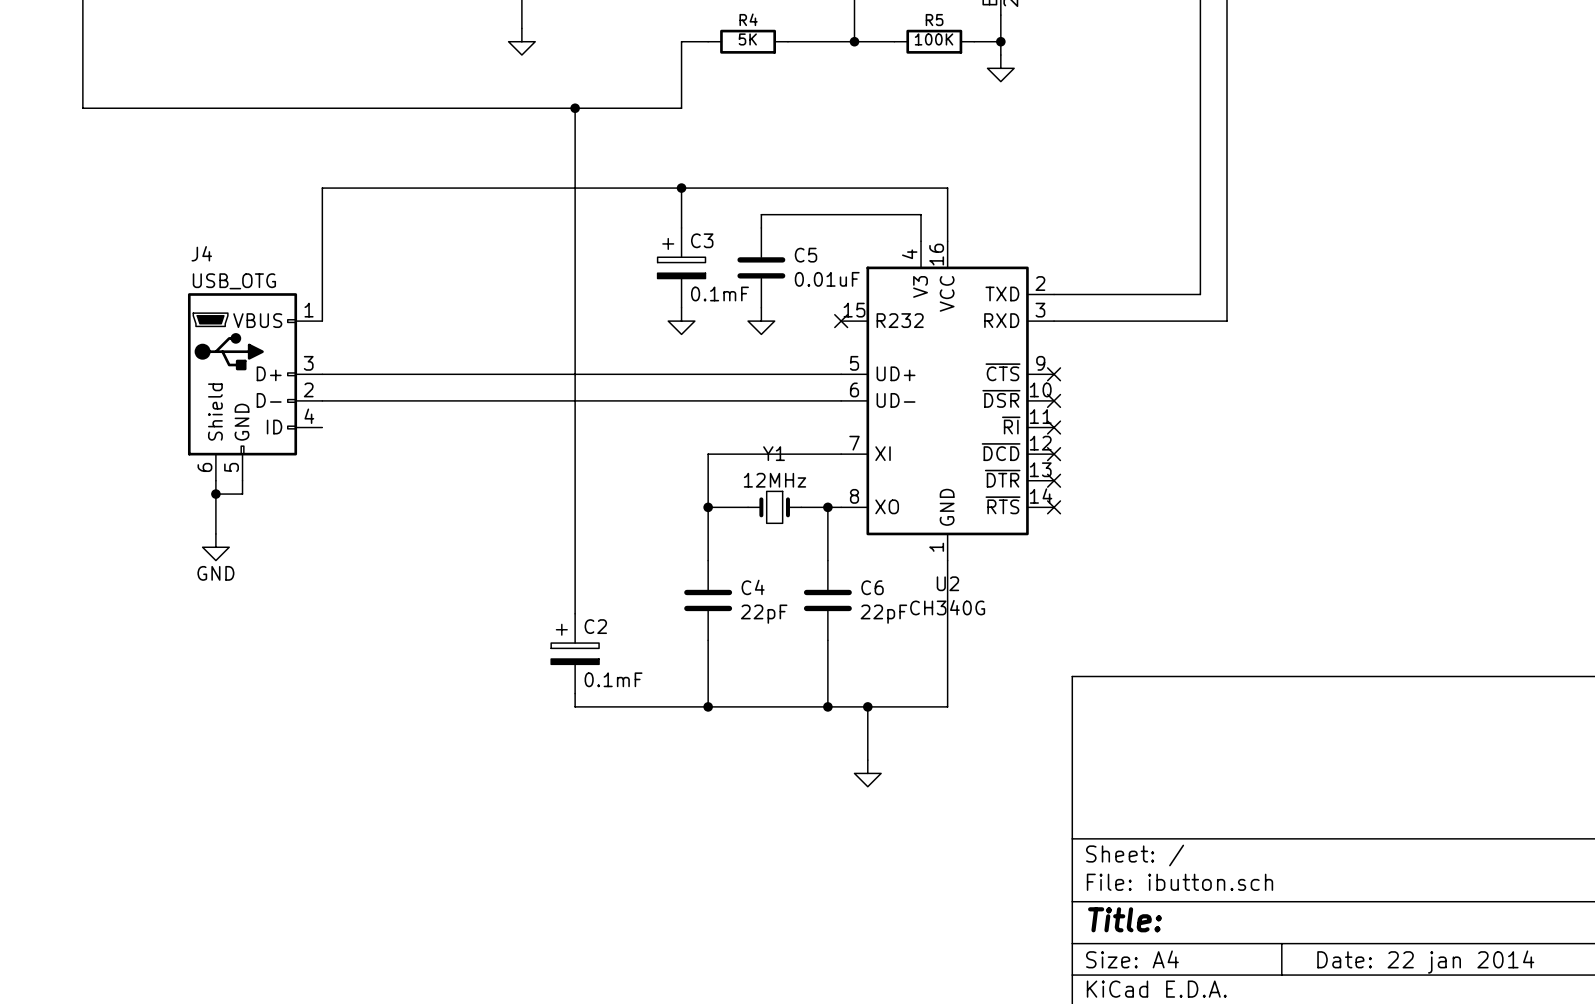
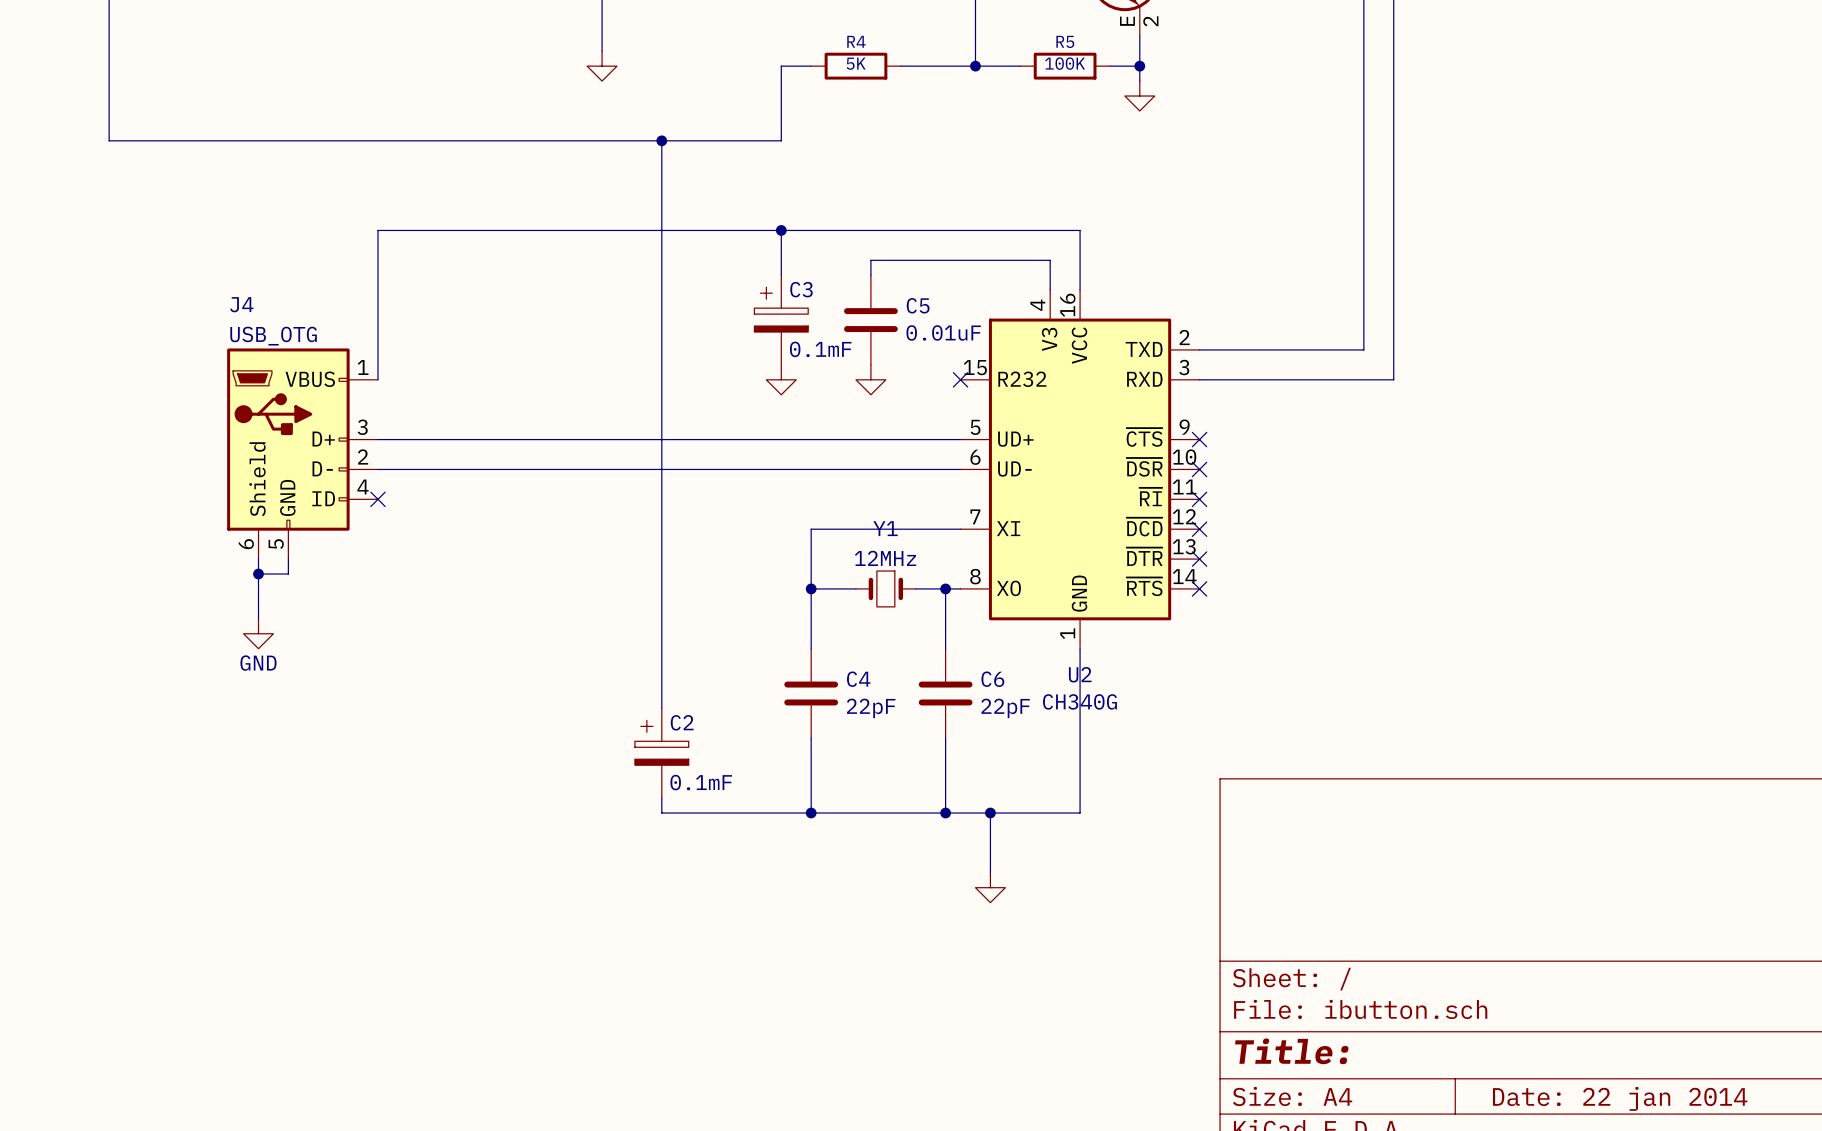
no-connect mark: none -> (378, 499)

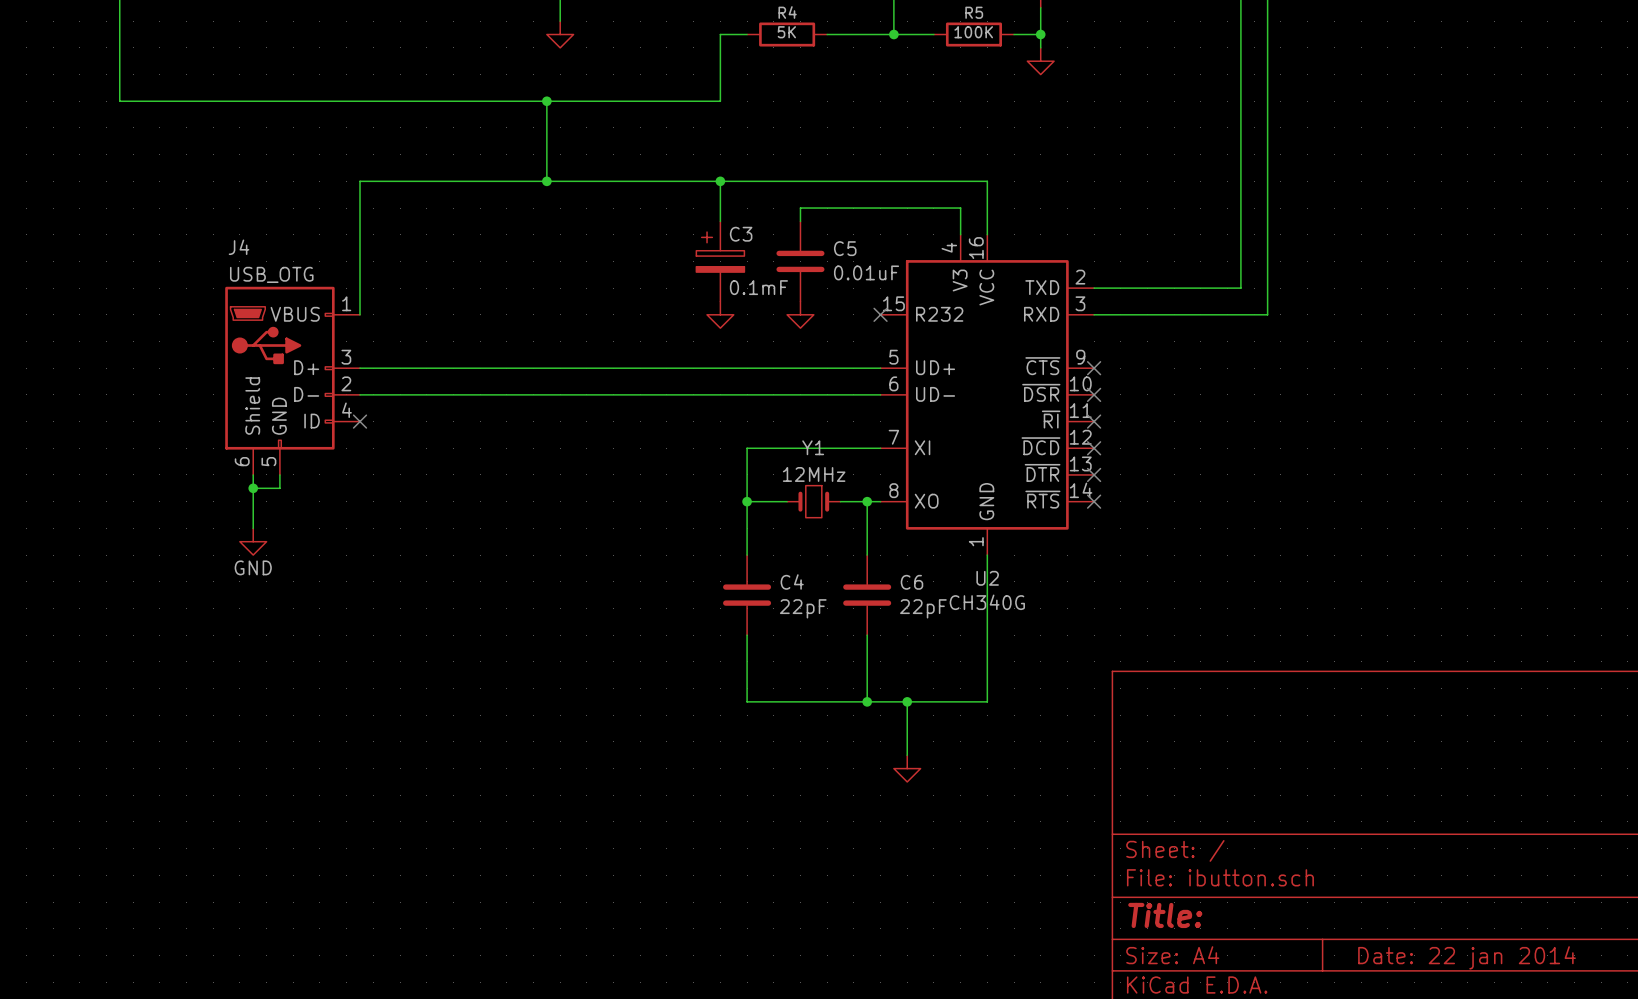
wire: none -> (546, 101) (546, 181)
junction: none -> (546, 101)
wire: (661, 140) (661, 708) -> none
junction: (661, 140) -> none
junction: none -> (546, 181)
C2: 0.1mF (661, 753) -> none
wire: (661, 798) (661, 813) (811, 813) -> none
junction: (811, 813) -> none

